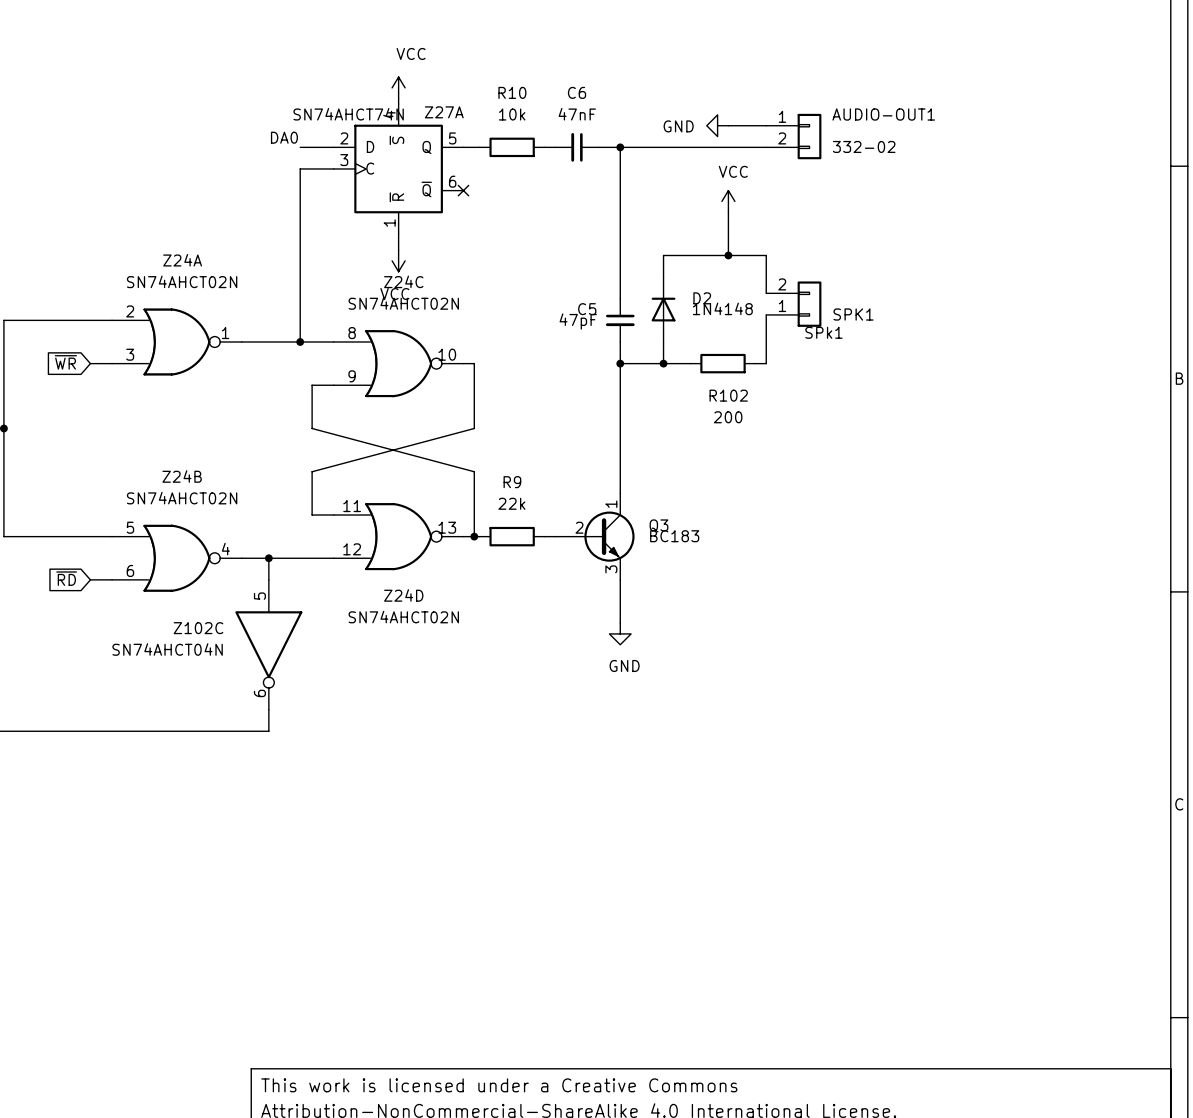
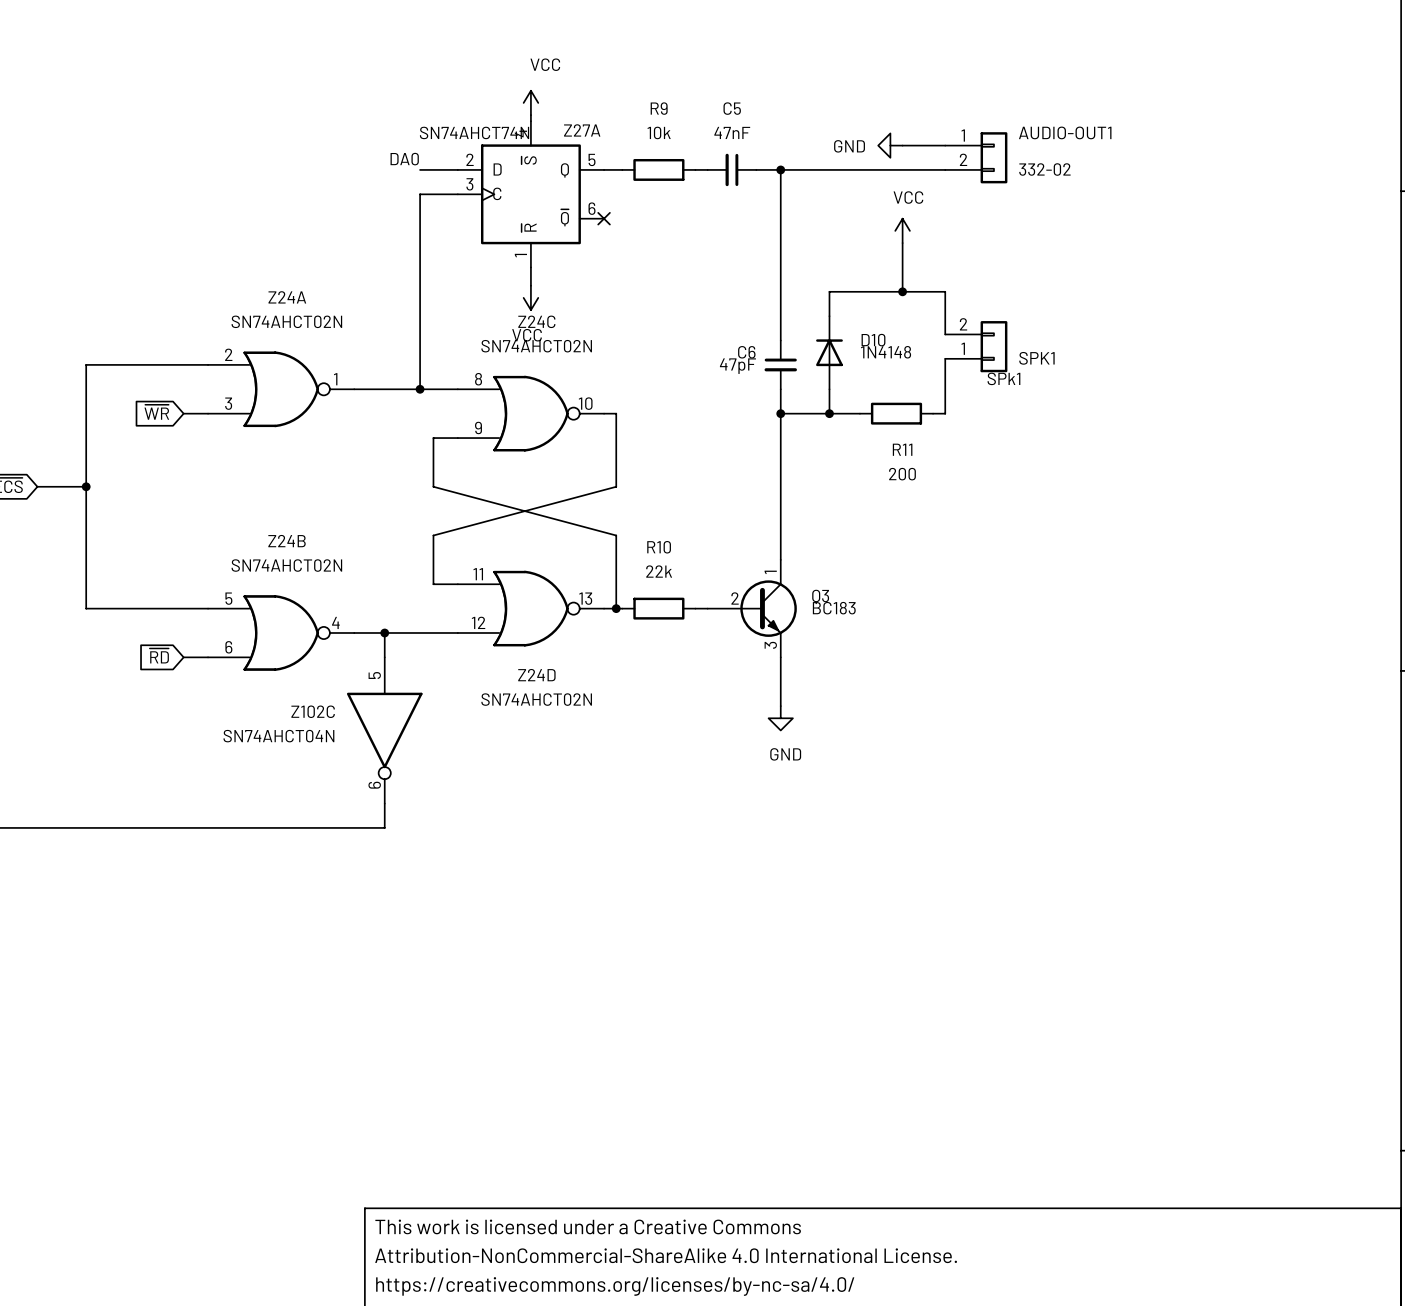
R10 name: R10 (512, 92) -> R9 (659, 108)
C6 name: C6 (577, 92) -> C5 (732, 108)
D2 name: D2 (702, 298) -> D10 (873, 340)
C5 name: C5 (587, 309) -> C6 (746, 352)
R102 name: R102 (728, 395) -> R11 (902, 449)
R9 name: R9 (512, 482) -> R10 (659, 547)

